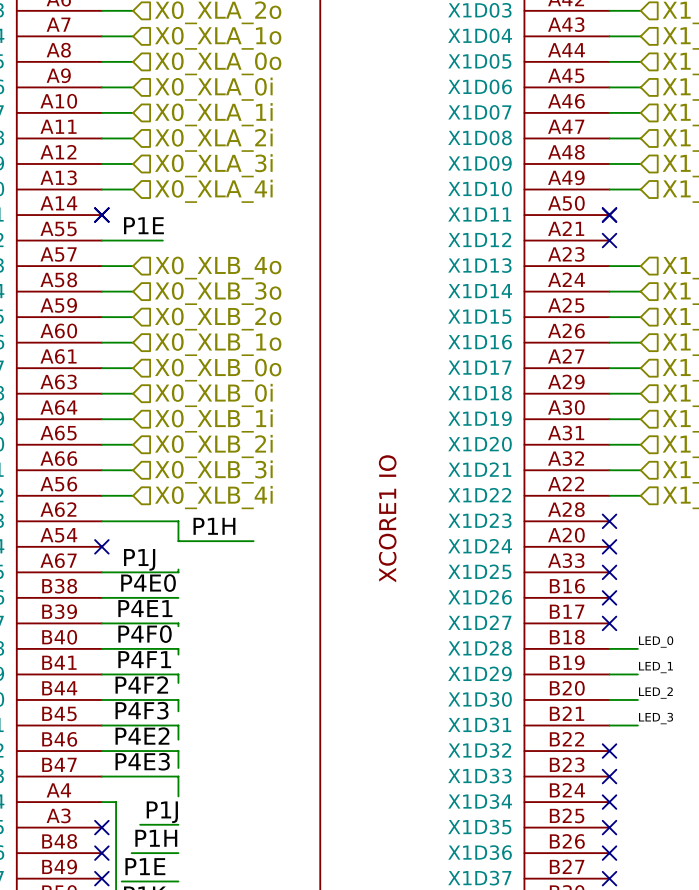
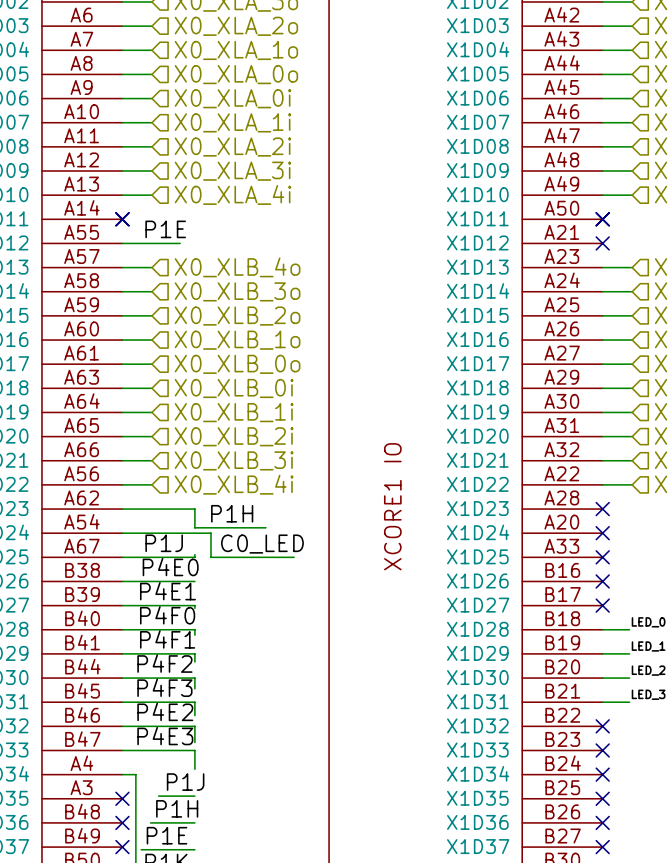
wire: none -> (122, 533) (211, 533) (211, 557) (294, 557)
no-connect mark: (101, 546) -> none
label: none -> C0_LED (262, 544)

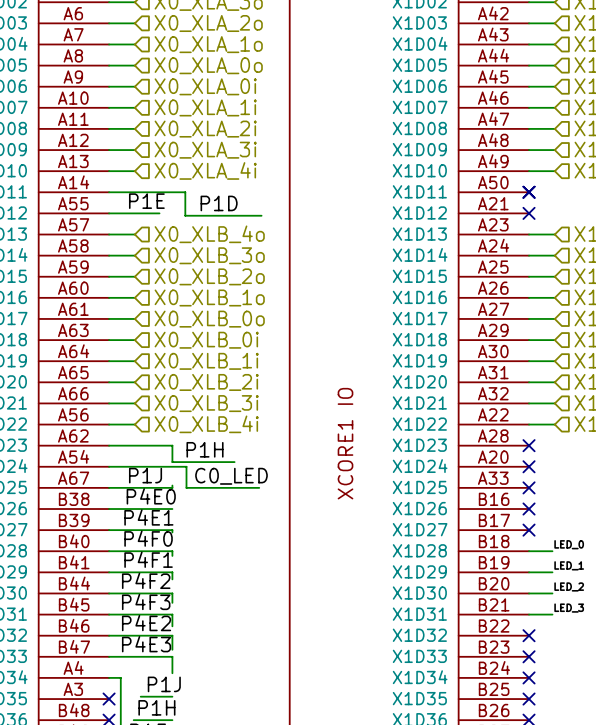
wire: none -> (109, 192) (185, 192) (185, 215) (261, 215)
no-connect mark: (122, 219) -> none
label: none -> P1D (219, 203)

